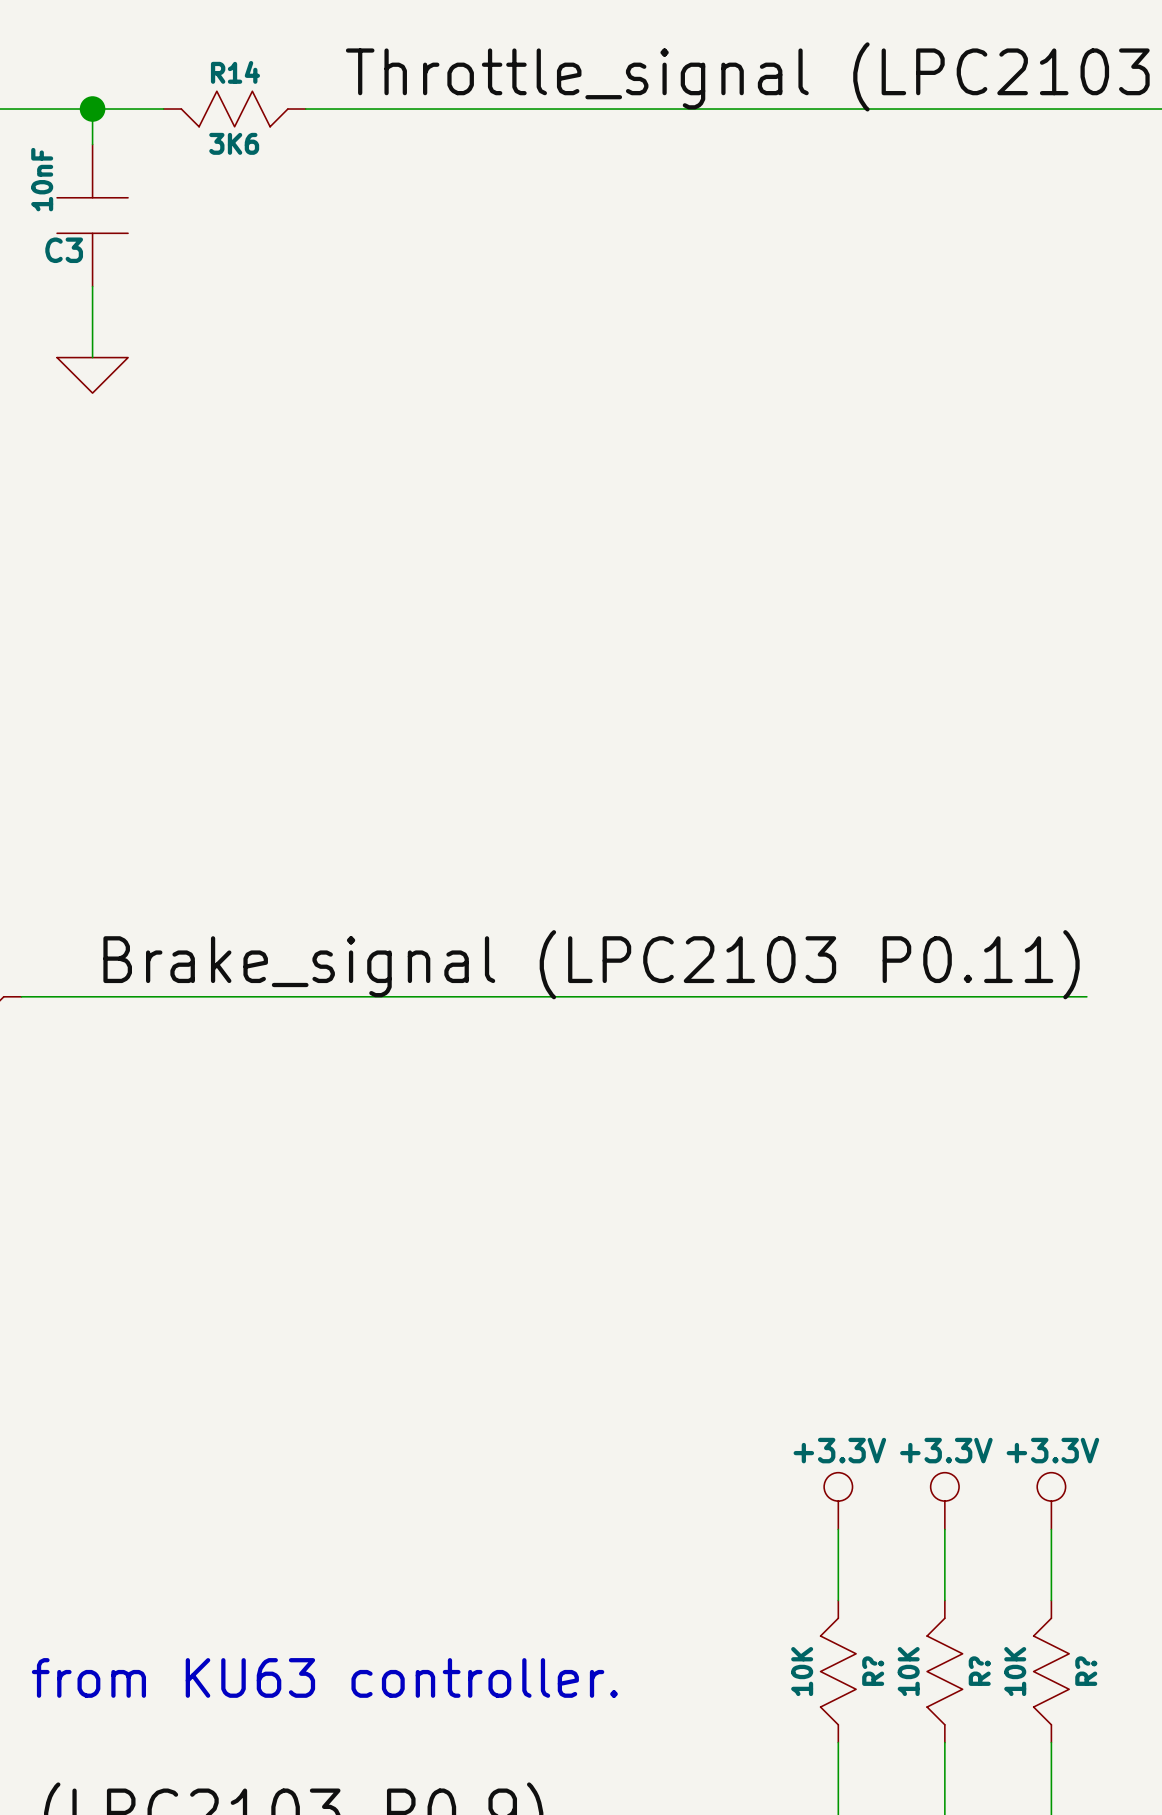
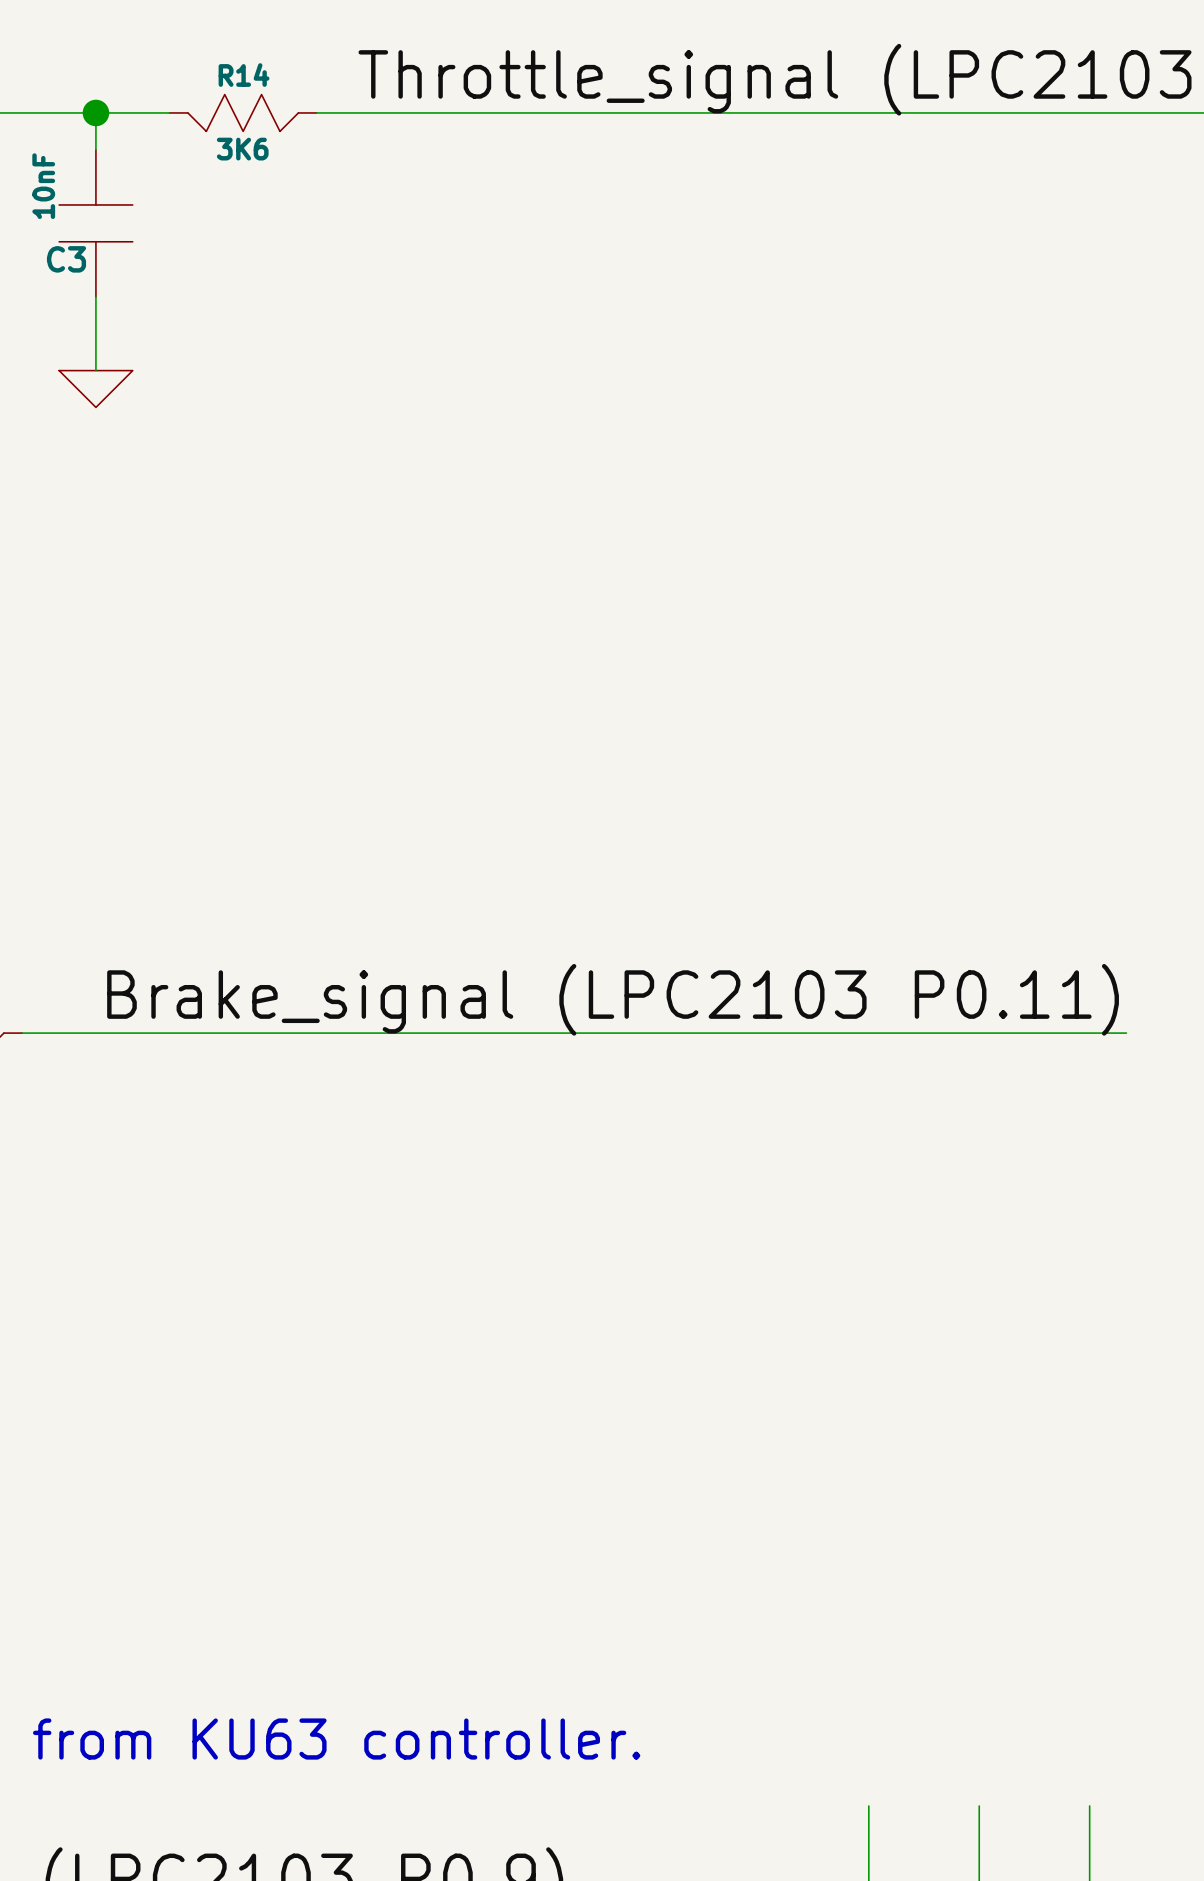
power symbol: +3.3V (838, 1501) -> none
power symbol: +3.3V (944, 1501) -> none
power symbol: +3.3V (1051, 1501) -> none
wire: (838, 1529) (838, 1600) -> none
wire: (944, 1529) (944, 1600) -> none
wire: (1051, 1529) (1051, 1600) -> none
R?: 10K (838, 1671) -> none
R?: 10K (944, 1671) -> none
R?: 10K (1051, 1671) -> none

